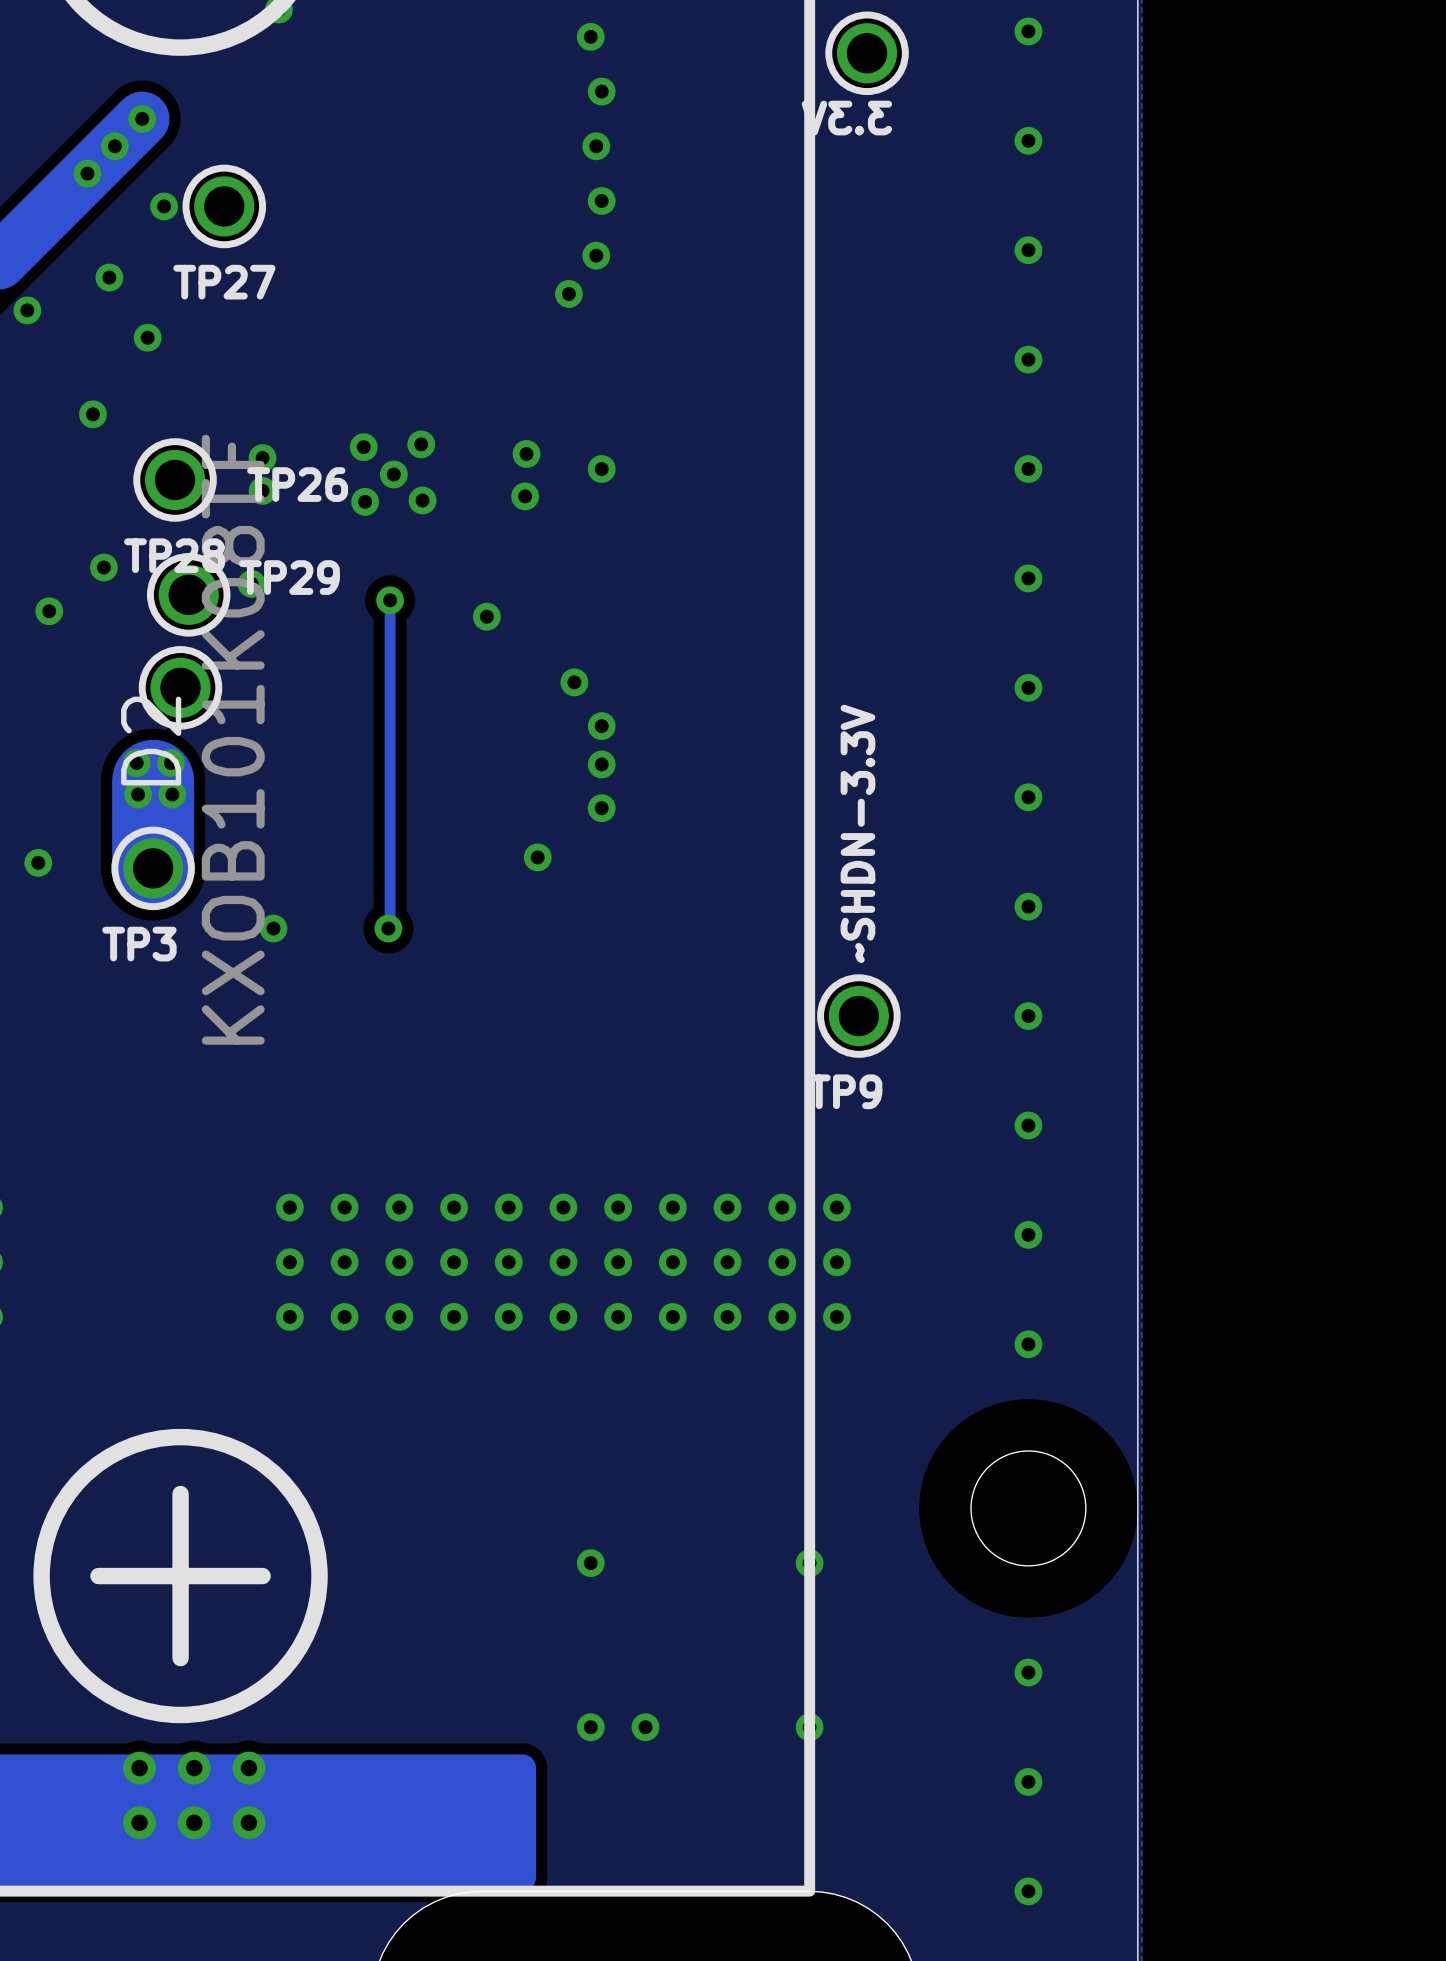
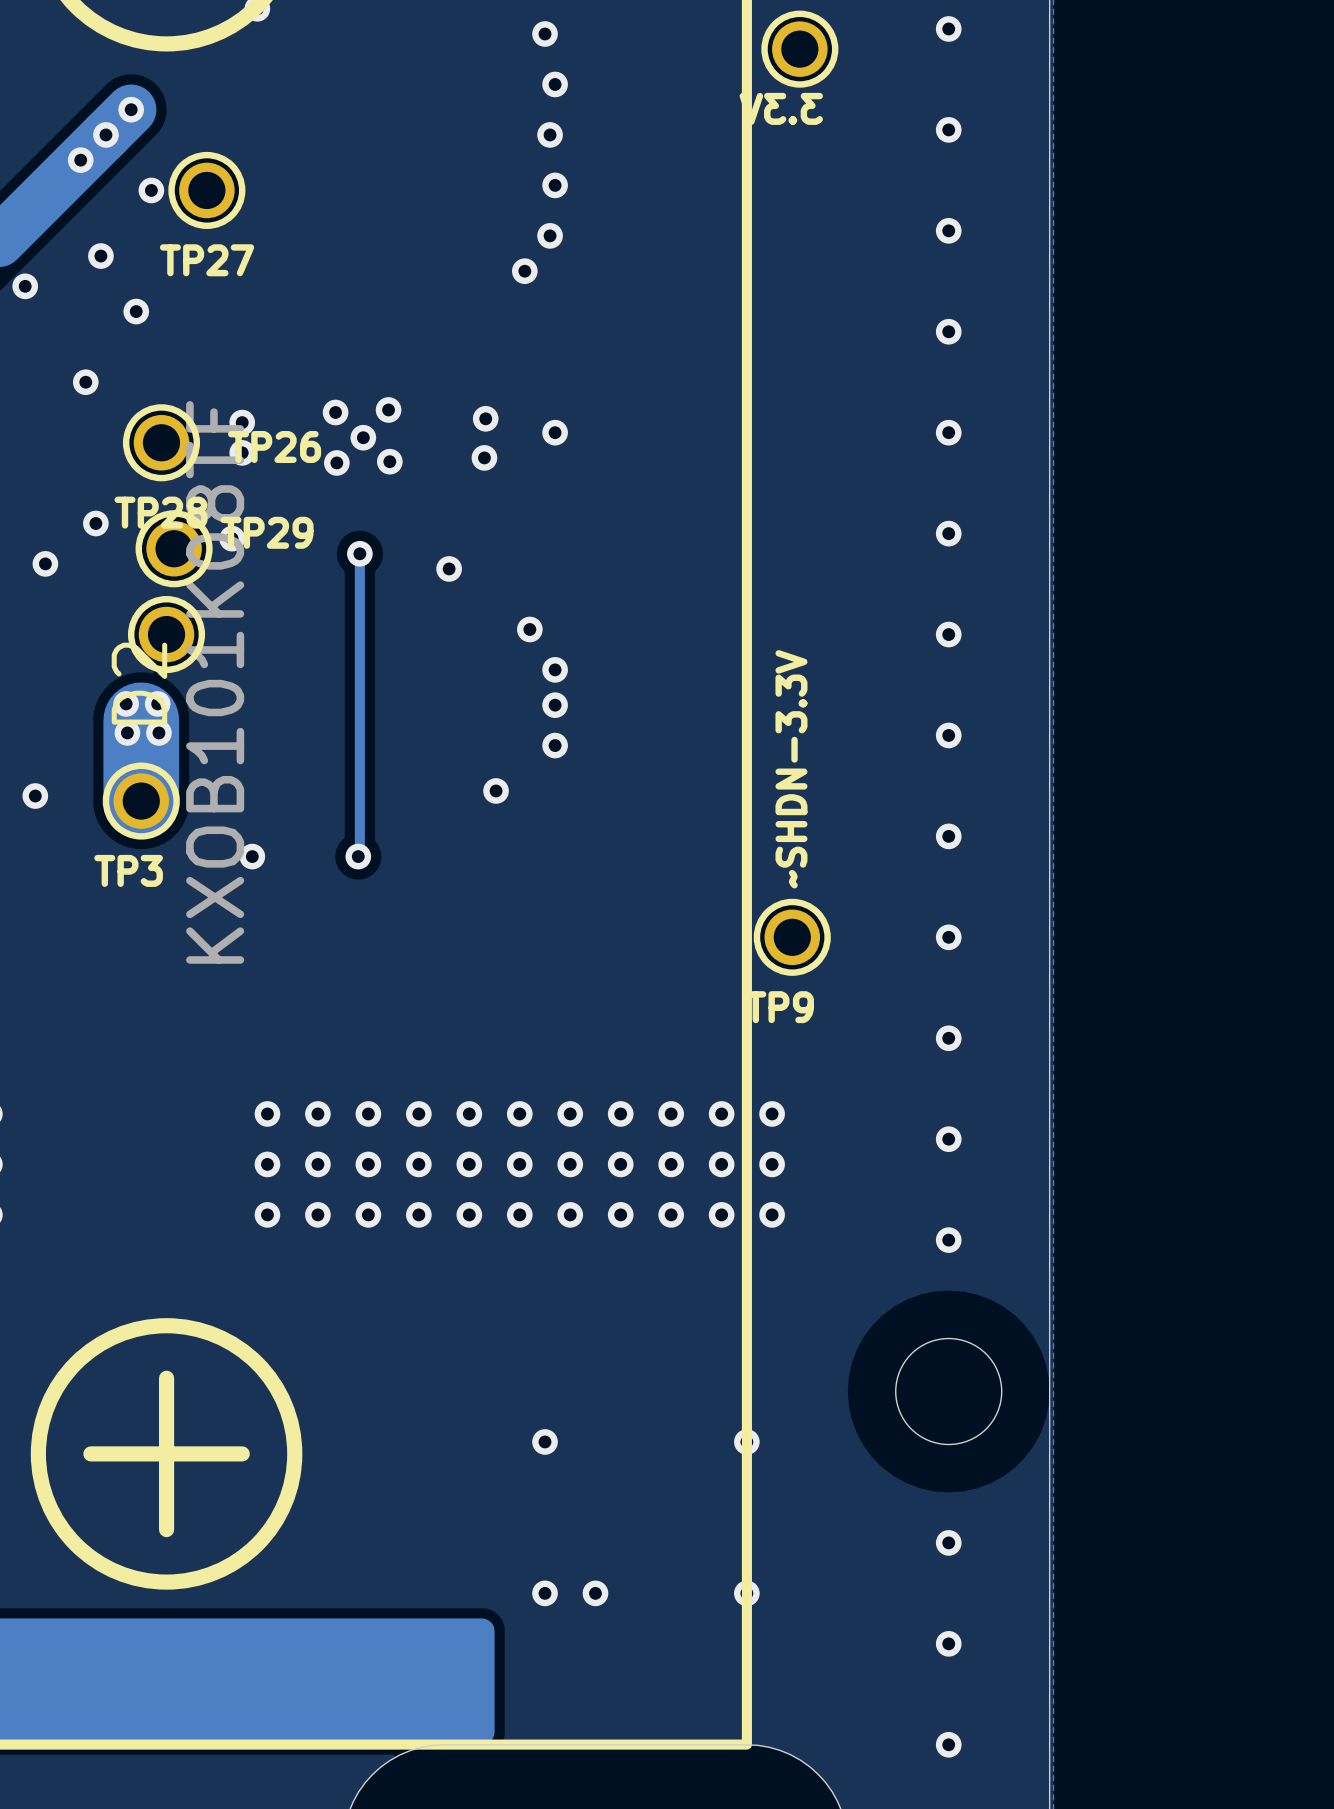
via: (139, 1768) -> none
via: (194, 1768) -> none
via: (248, 1768) -> none
via: (139, 1822) -> none
via: (194, 1822) -> none
via: (248, 1822) -> none

